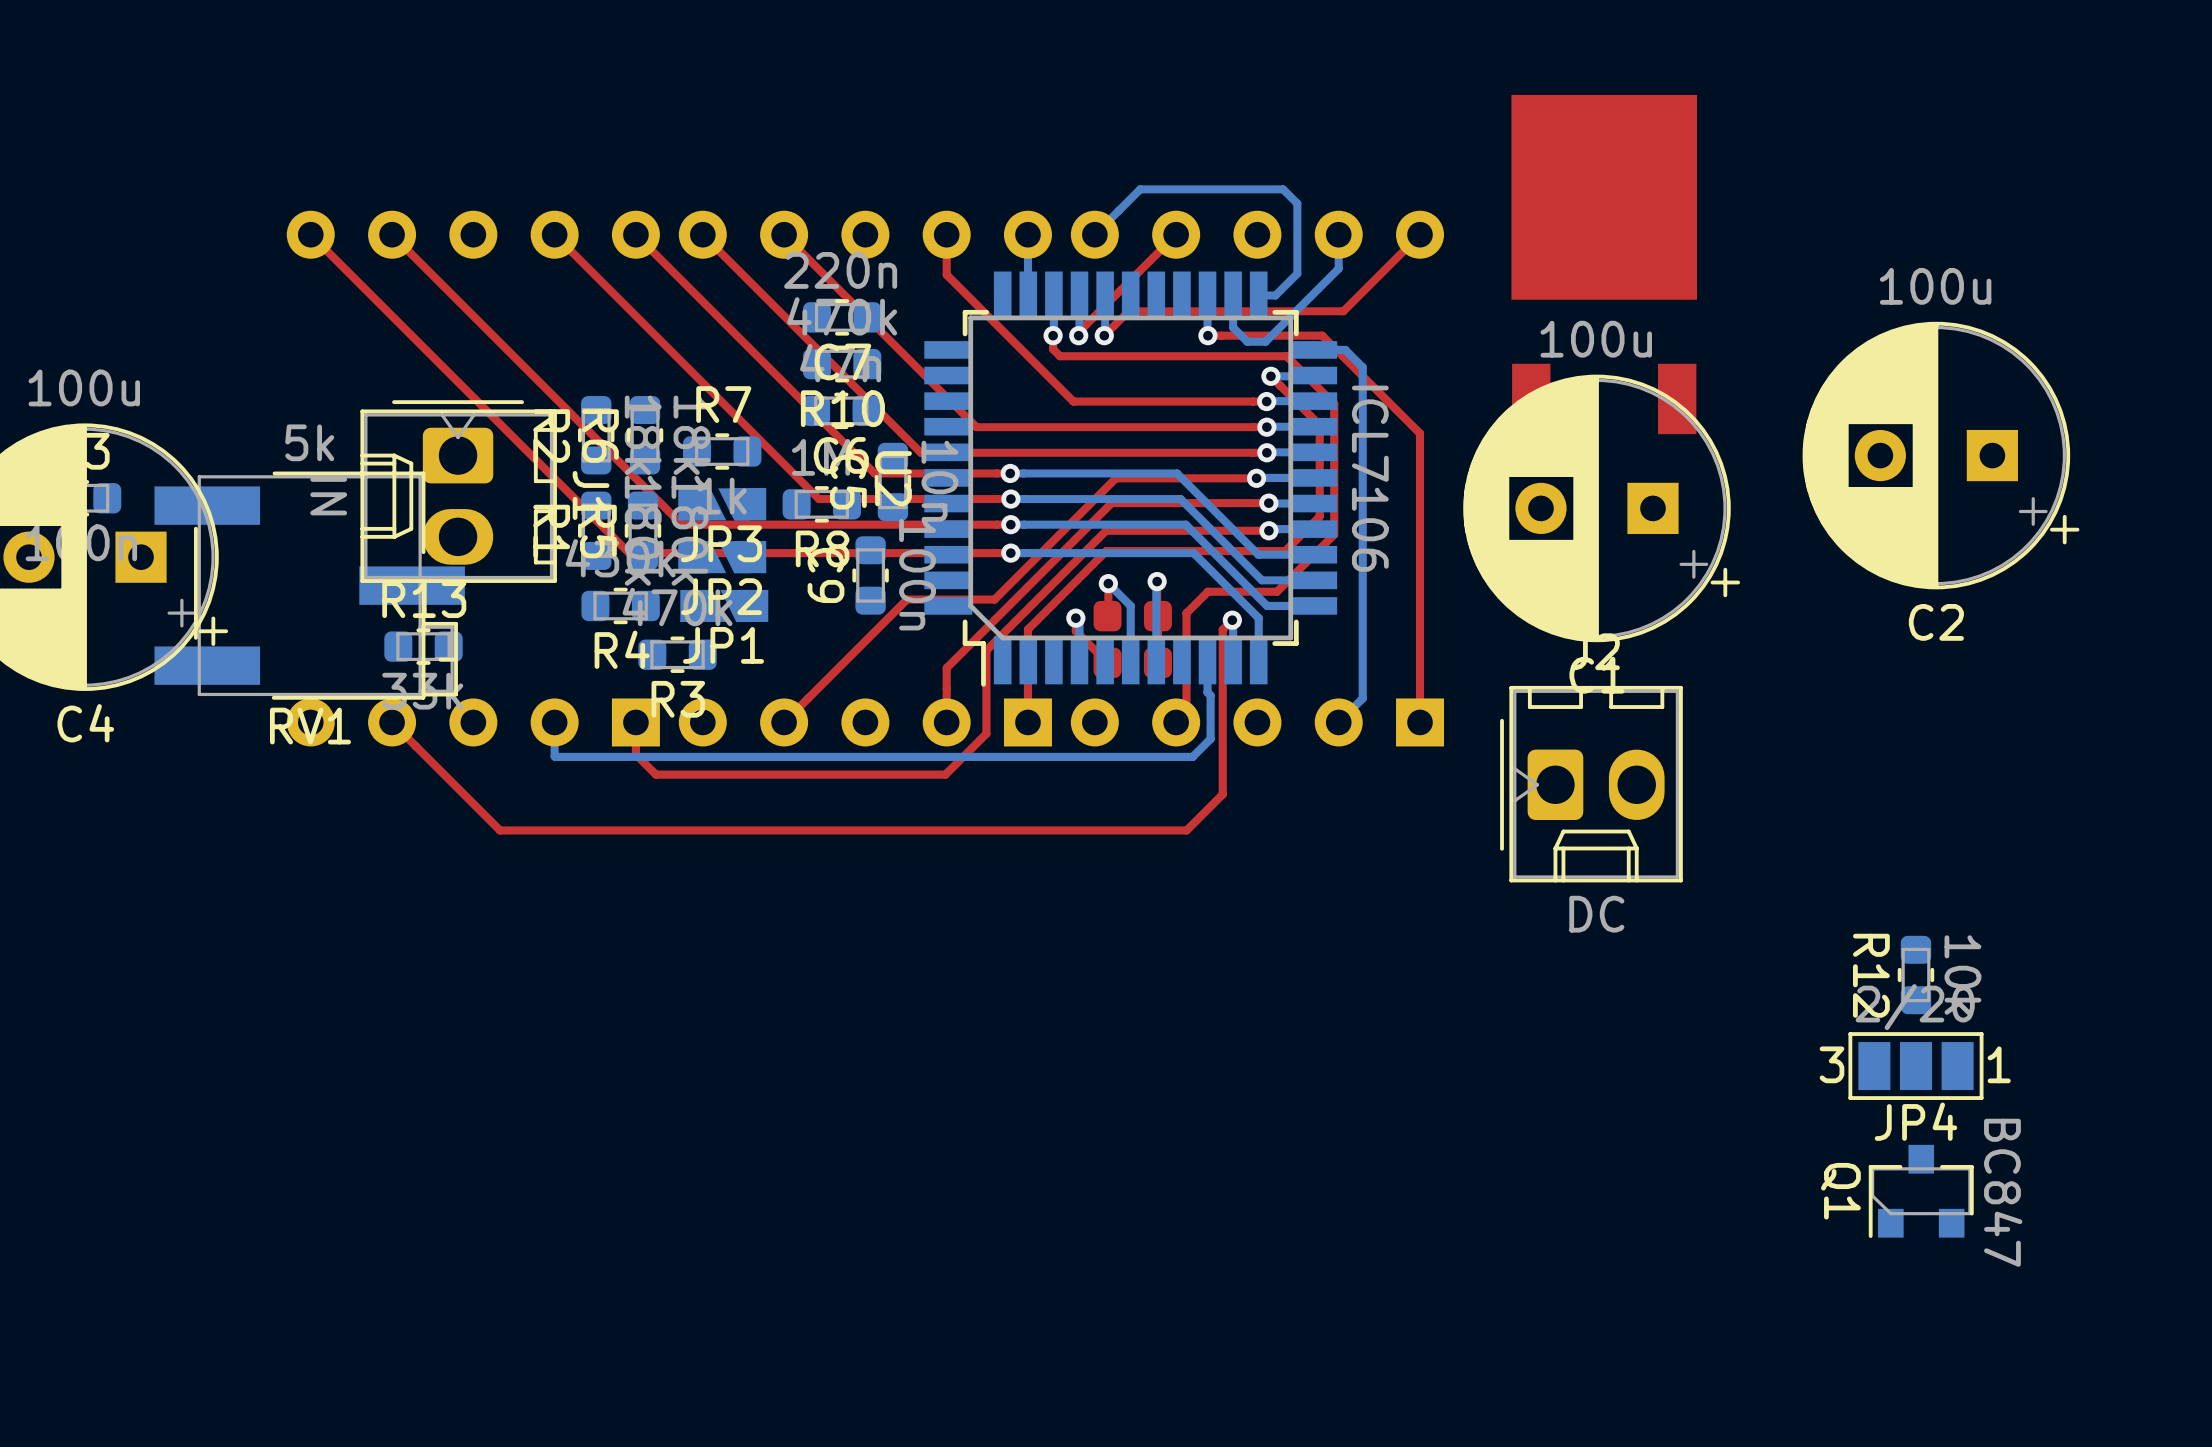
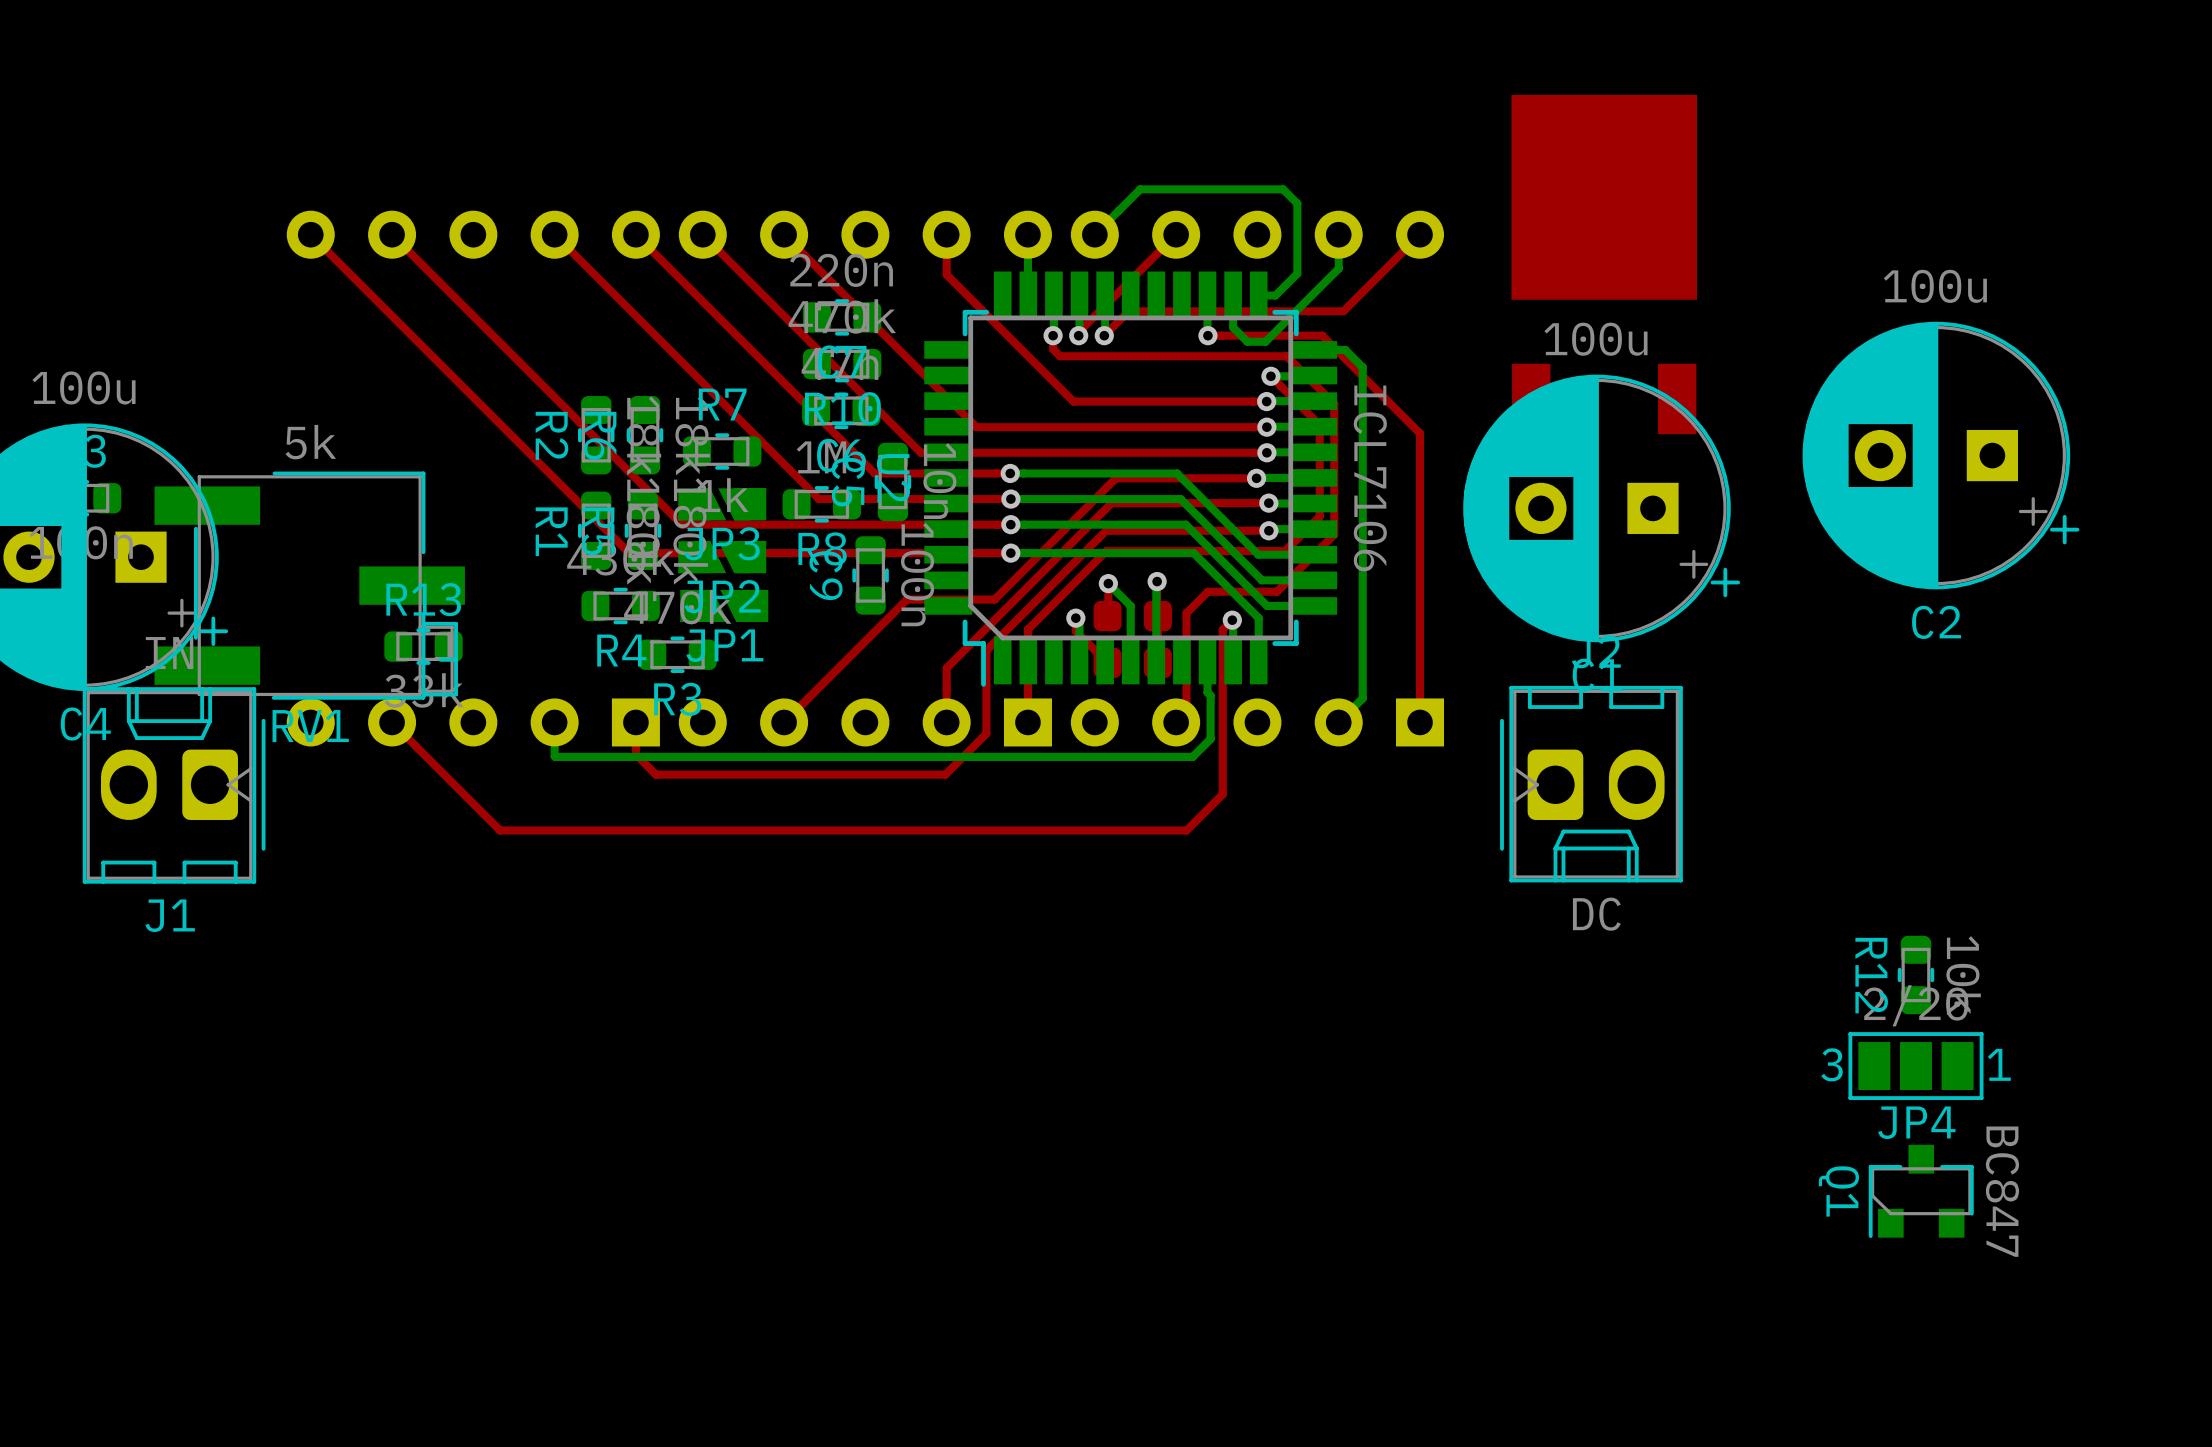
J1 rotation: 0° (458, 491) -> 90° clockwise (174, 785)
J1 position: (458, 491) -> (174, 785)

